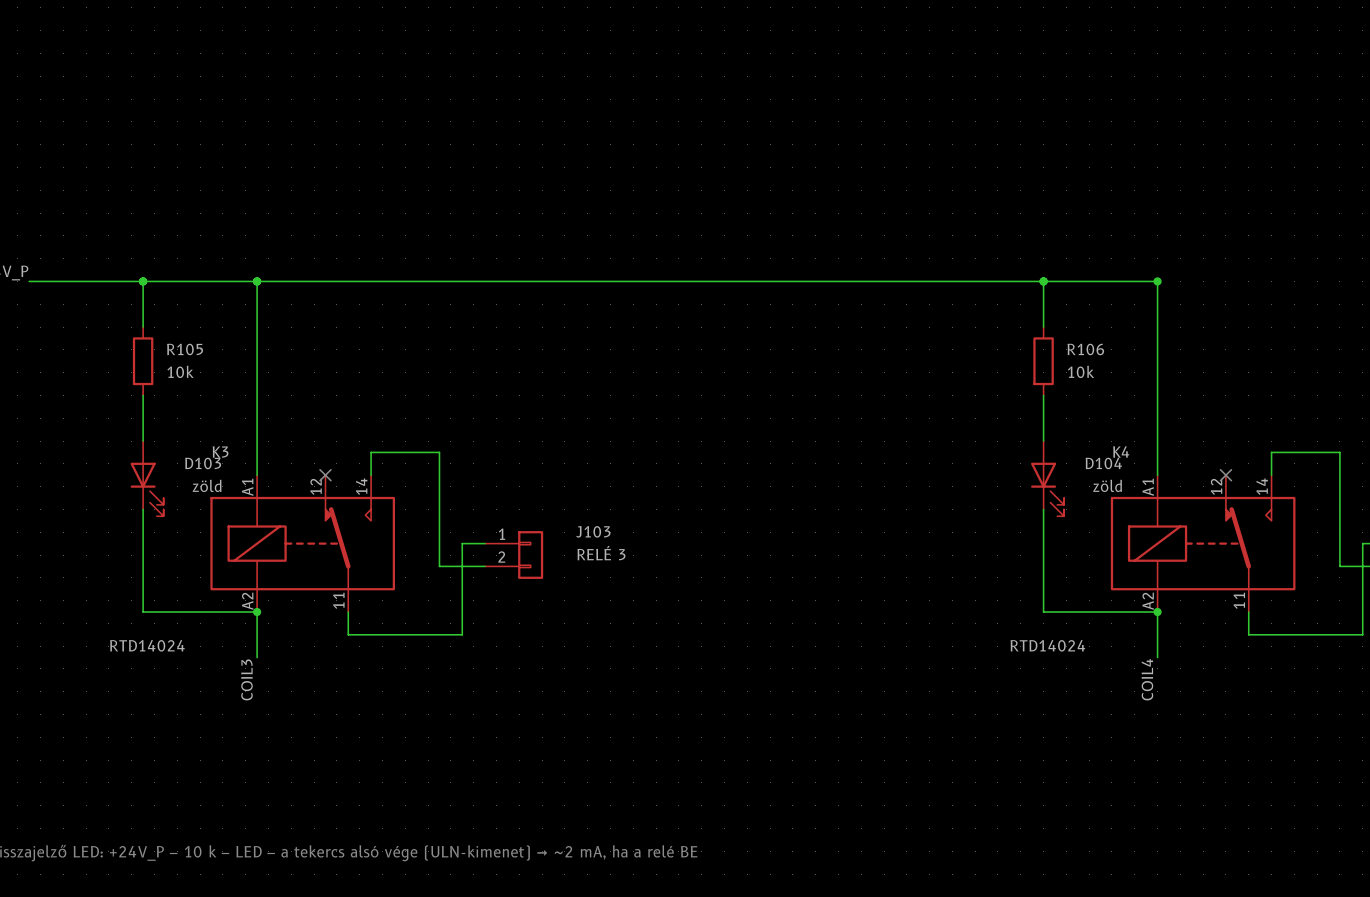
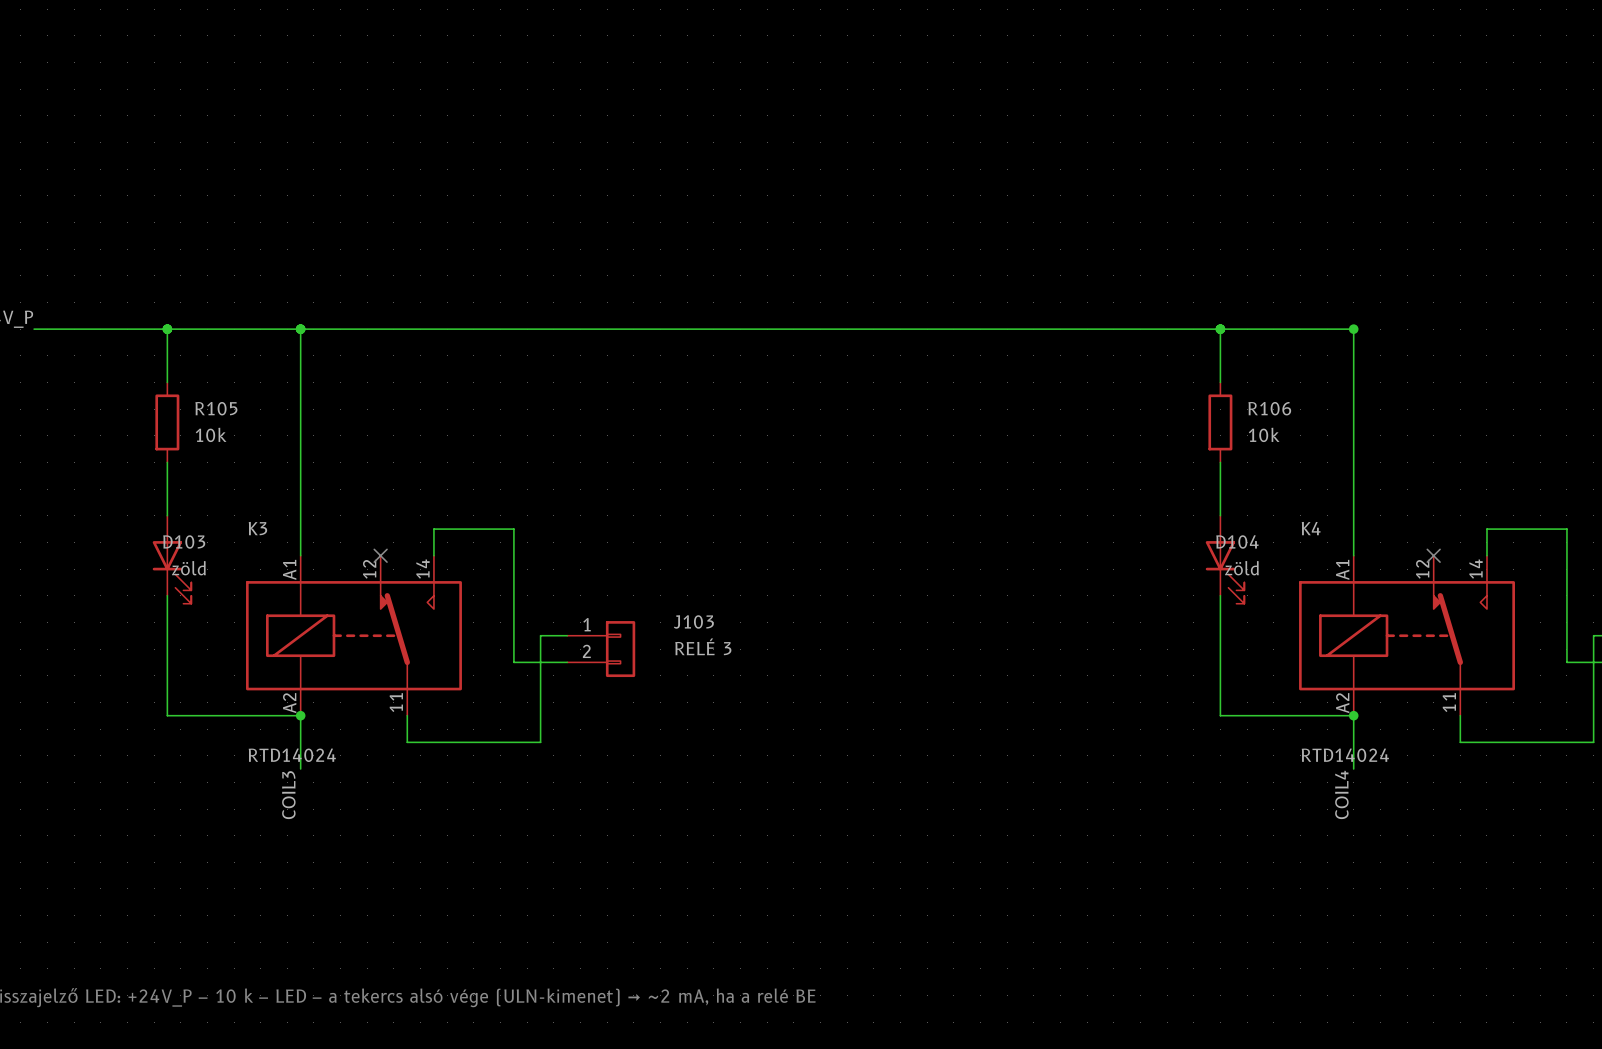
D103 name position: D103 (203, 463) -> D103 (184, 541)
D104 name position: D104 (1103, 463) -> D104 (1237, 541)
D103 value position: zöld (207, 485) -> zöld (188, 568)
D104 value position: zöld (1107, 485) -> zöld (1241, 568)
K3 value position: RTD14024 (147, 645) -> RTD14024 (292, 755)
K4 value position: RTD14024 (1047, 645) -> RTD14024 (1345, 755)

